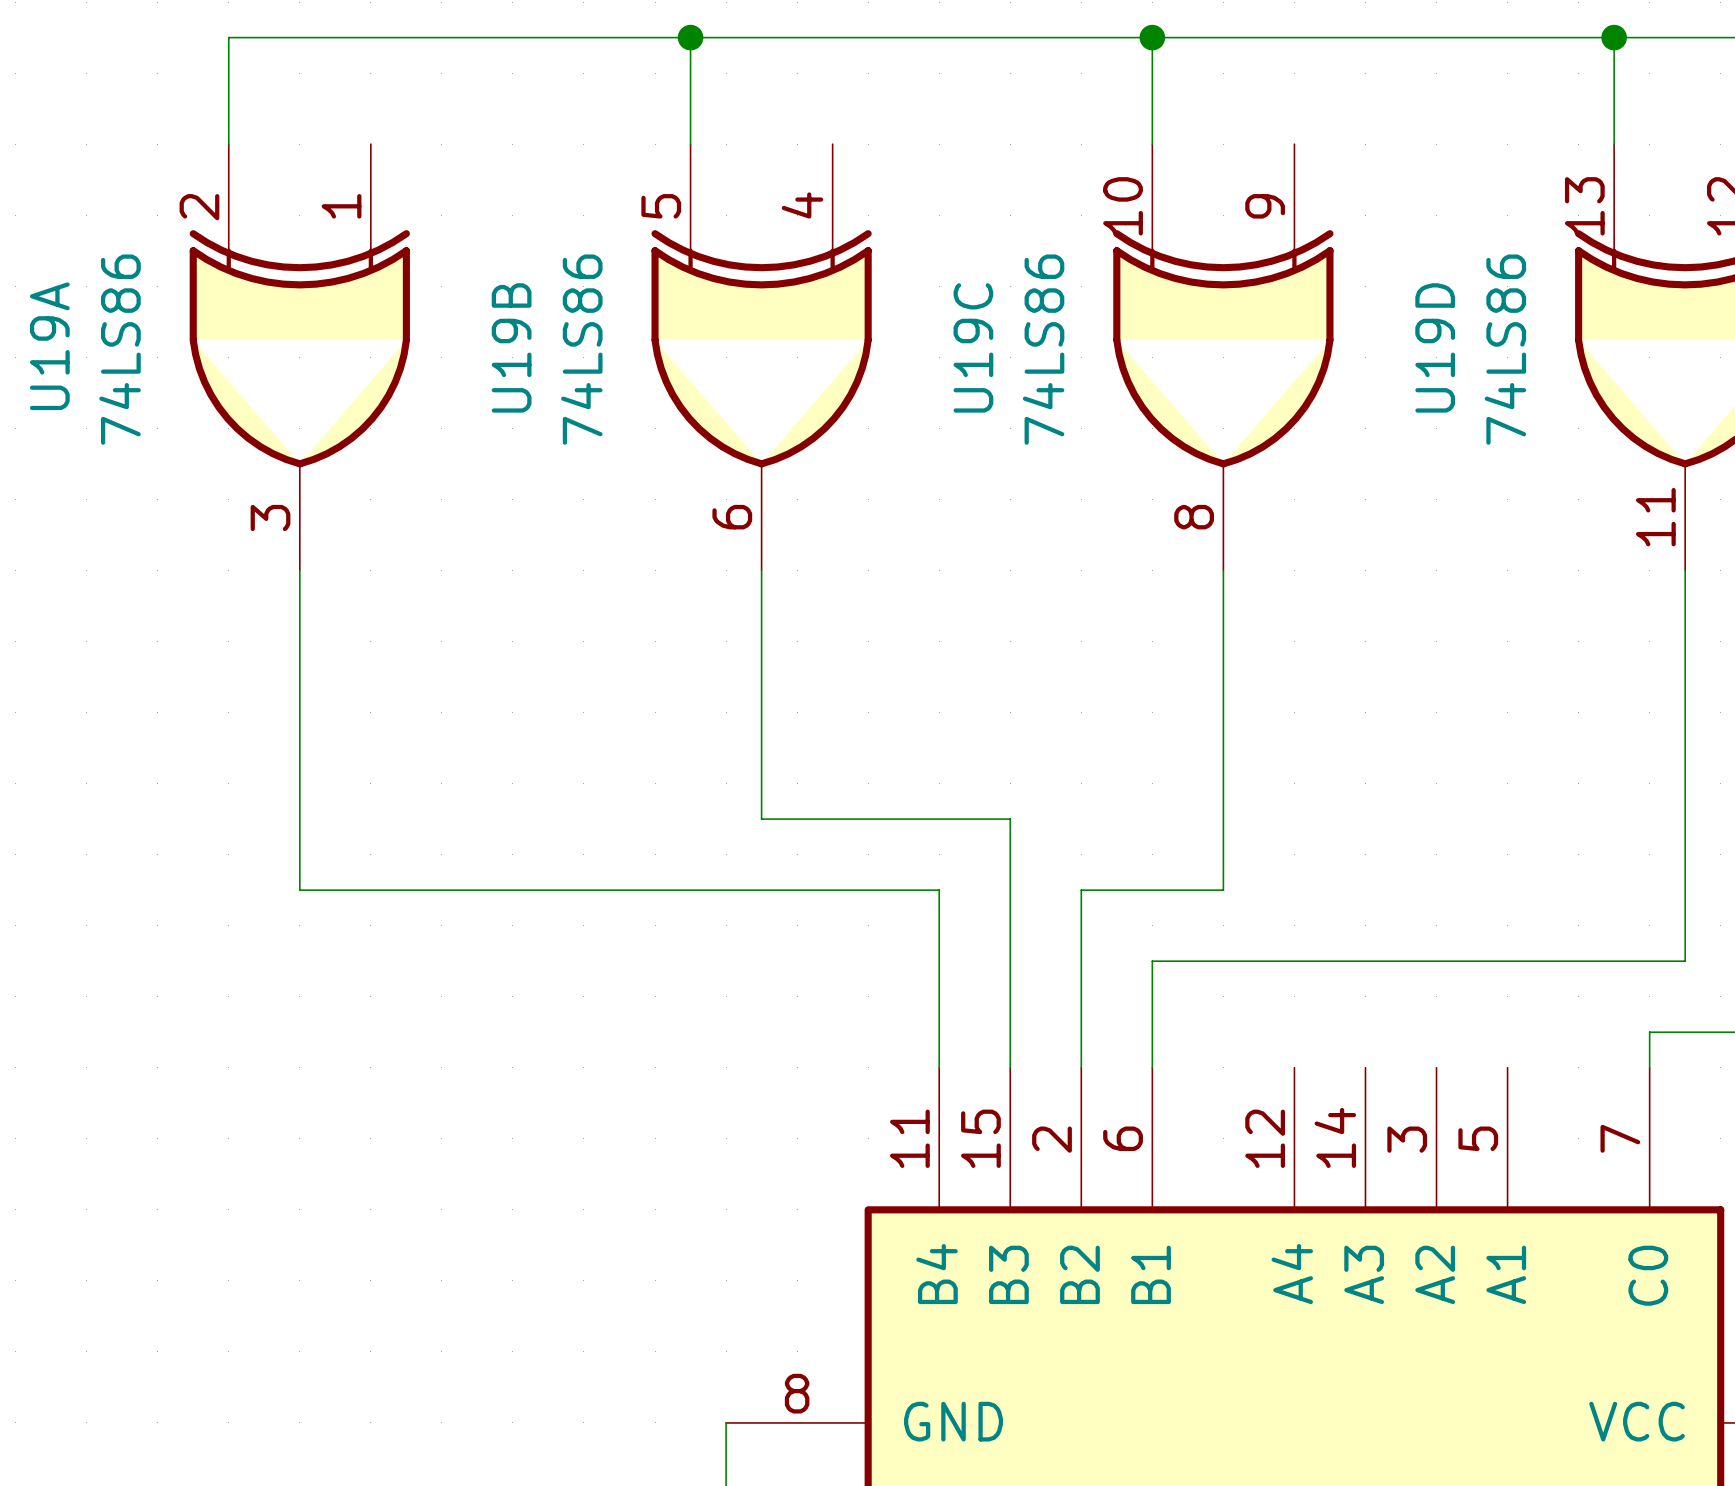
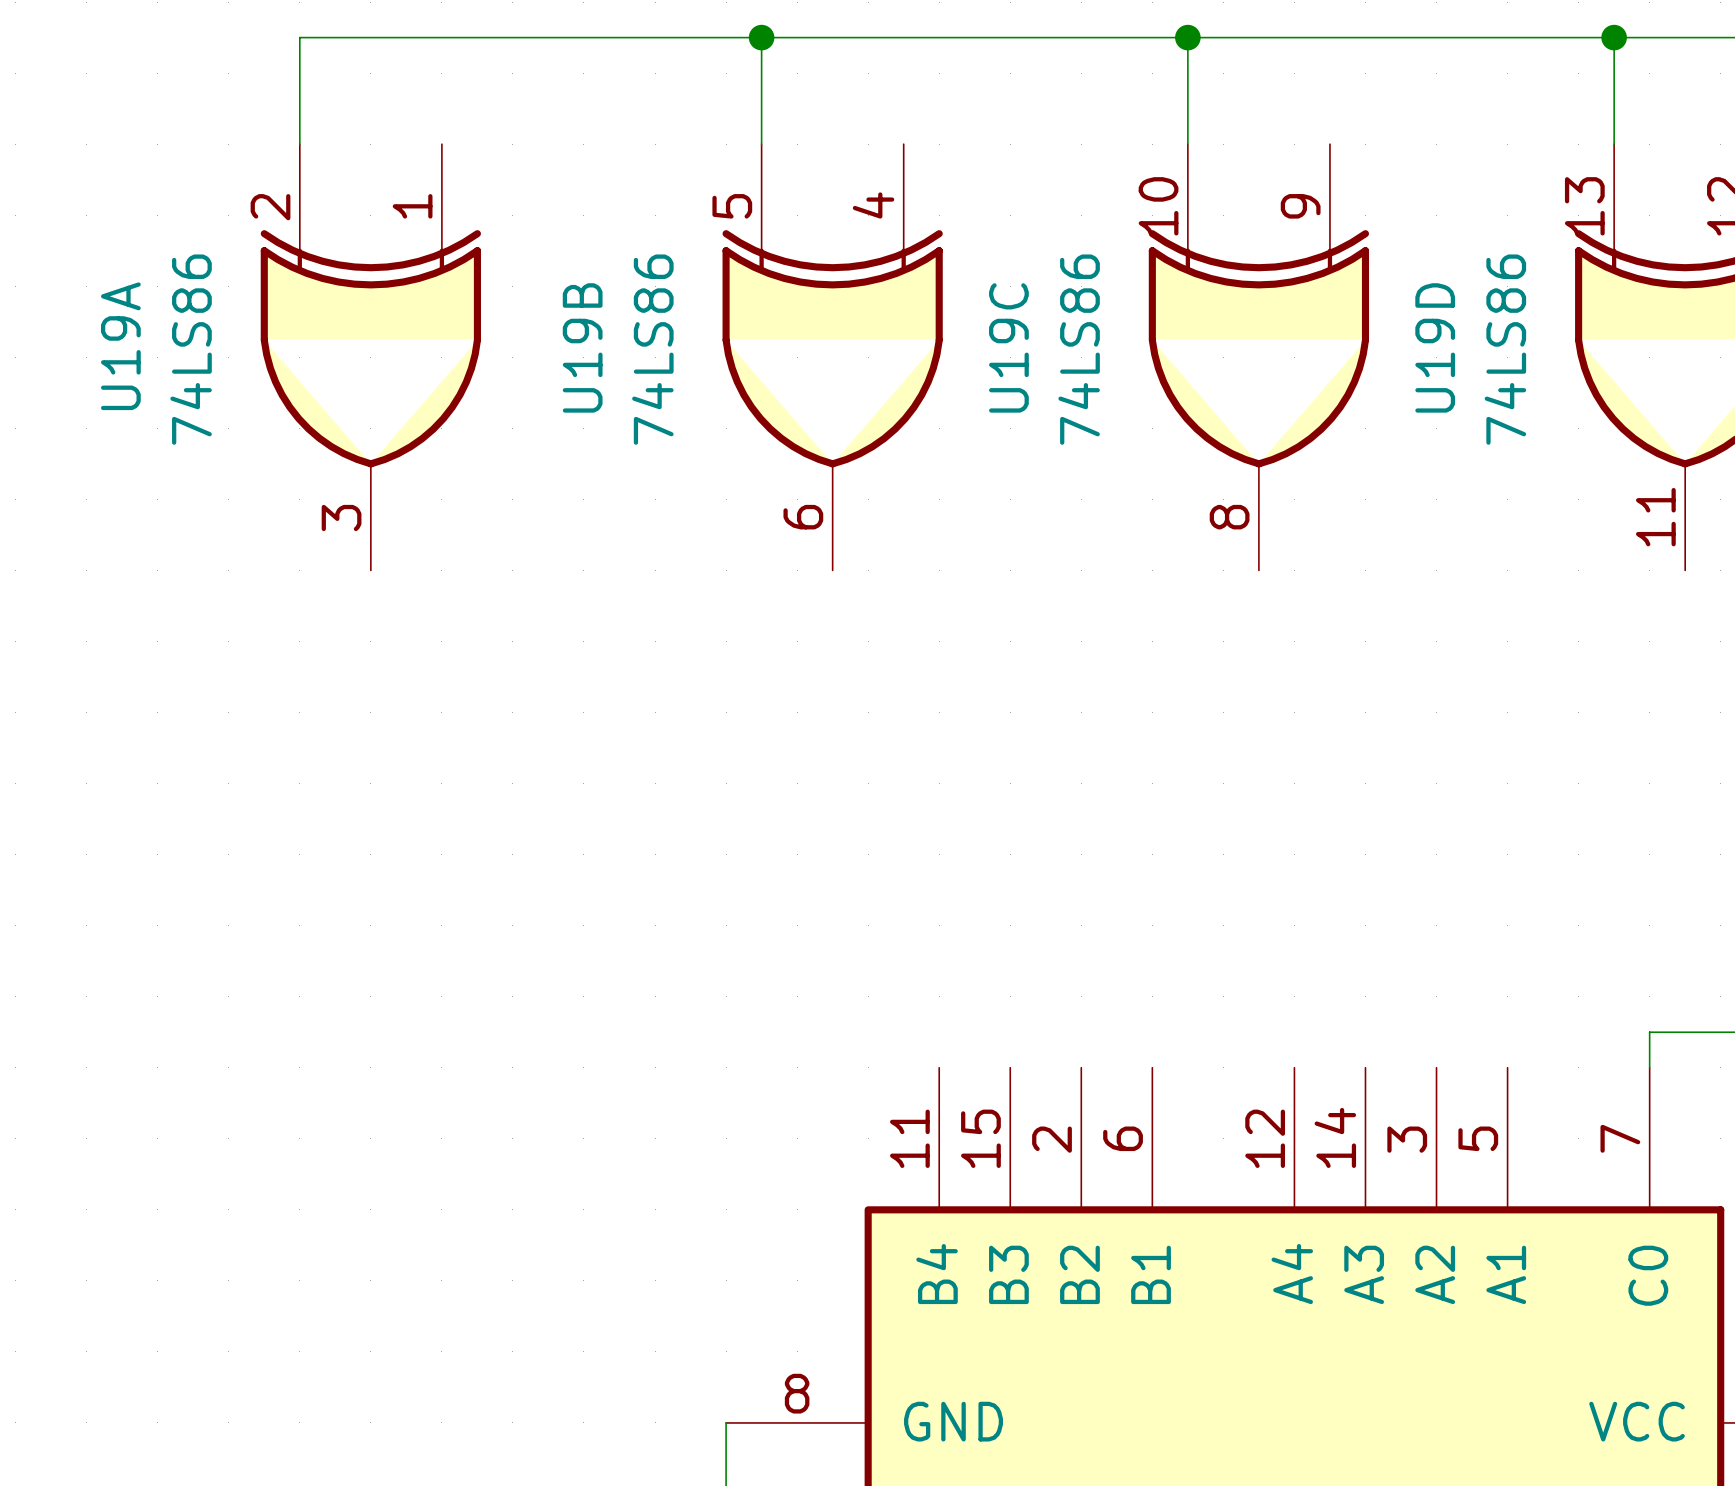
wire: (299, 37) (228, 37) (228, 144) -> (299, 37) (299, 144)
wire: (690, 37) (690, 144) -> (1187, 37) (1187, 144)
junction position: (690, 37) -> (761, 37)
wire: (1152, 37) (1152, 144) -> (761, 37) (761, 144)
junction position: (1152, 37) -> (1187, 37)
U19A position: (299, 357) -> (370, 357)
U19B position: (761, 357) -> (832, 357)
U19C position: (1223, 357) -> (1258, 357)
wire: (299, 570) (299, 890) (939, 890) (939, 1067) -> none
wire: (761, 570) (761, 819) (1010, 819) (1010, 1067) -> none
wire: (1223, 570) (1223, 890) (1081, 890) (1081, 1067) -> none
wire: (1685, 570) (1685, 961) (1152, 961) (1152, 1067) -> none

